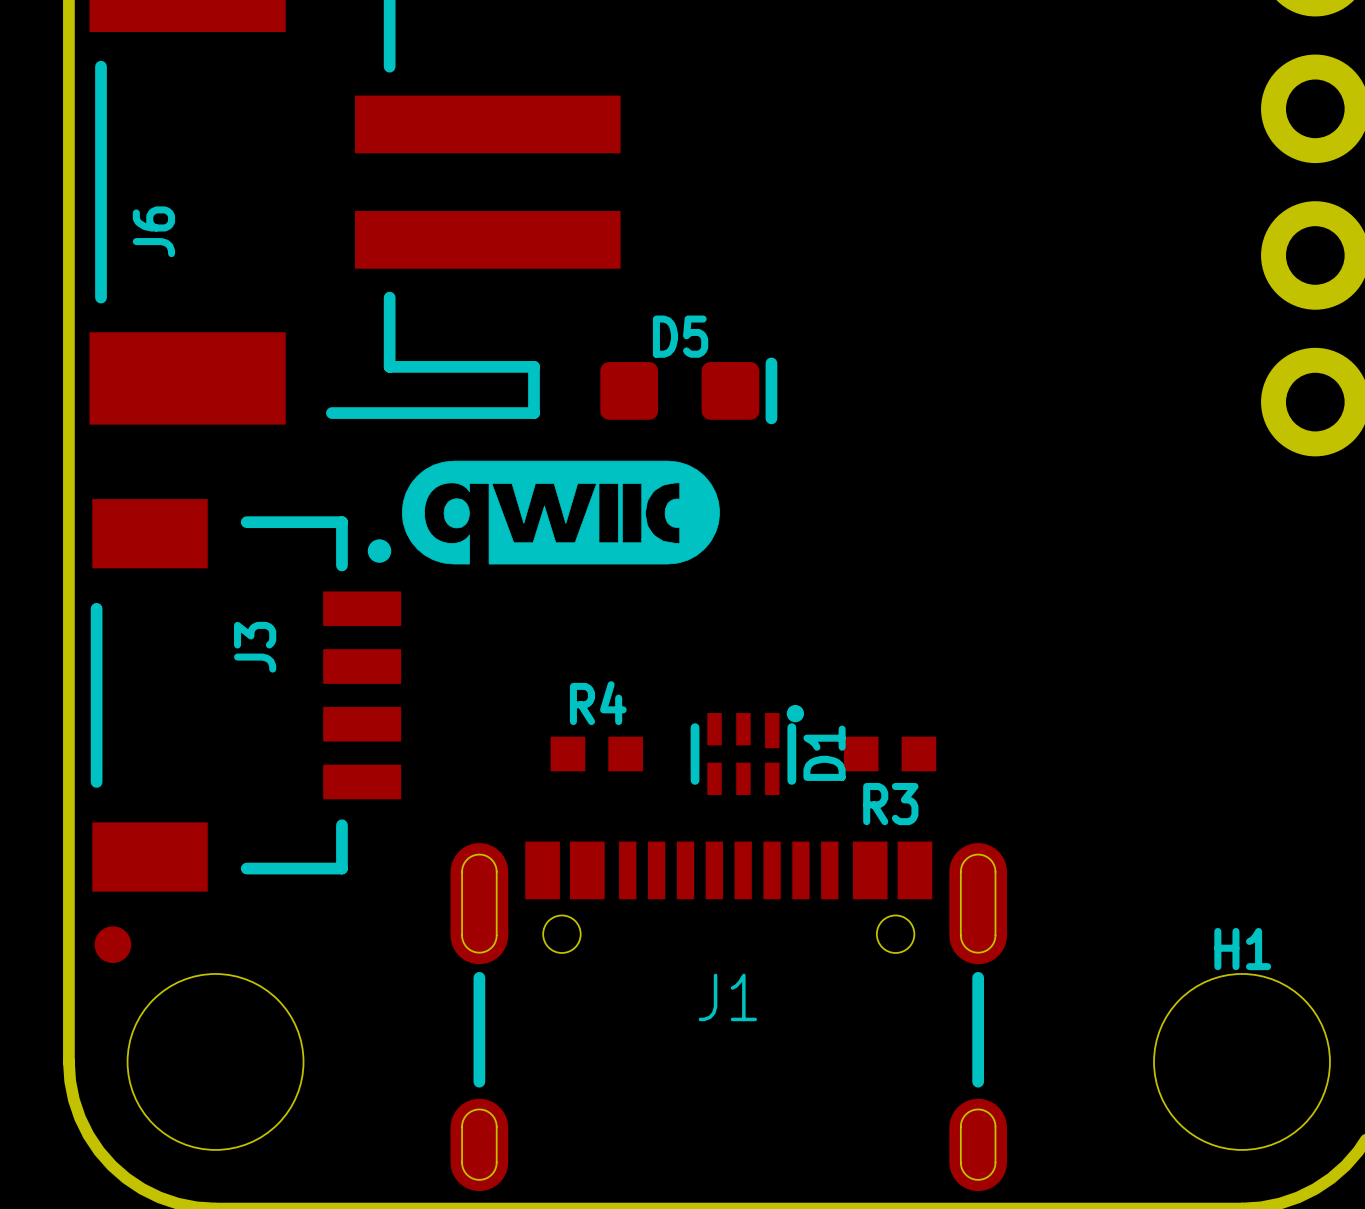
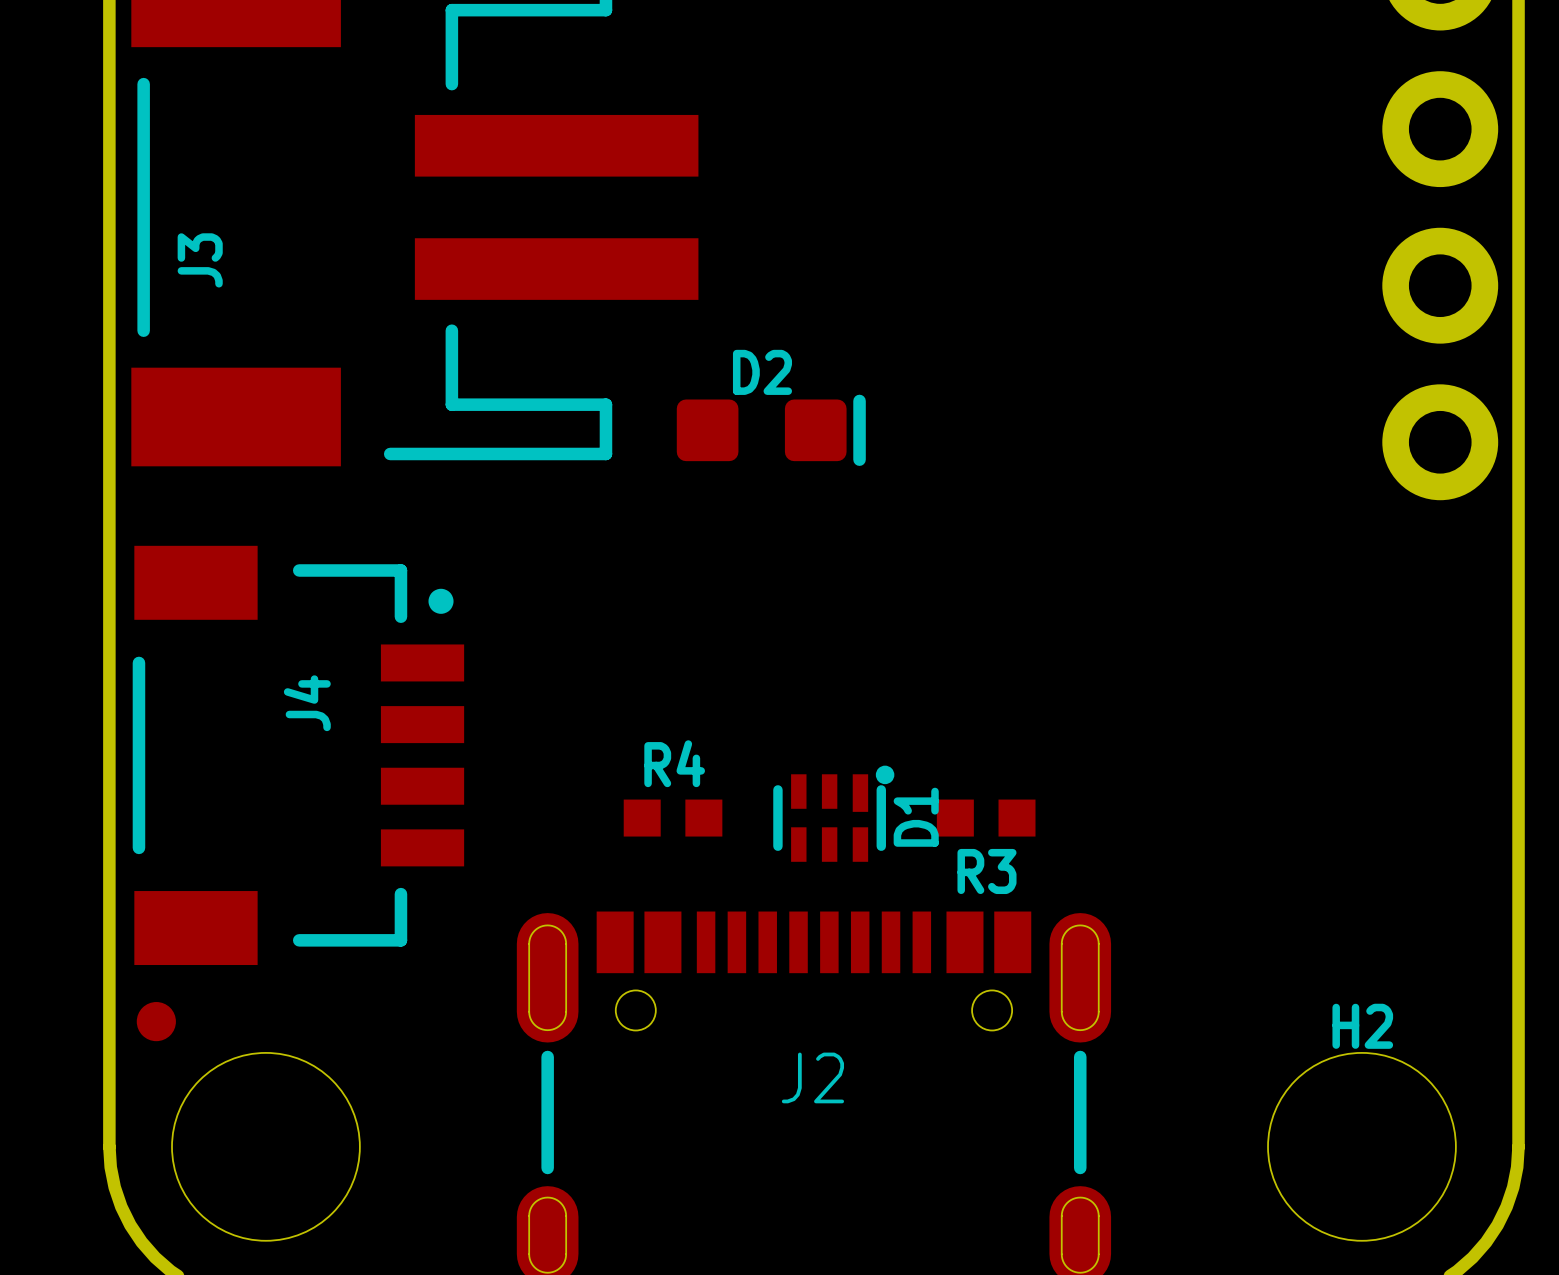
J6 name: J6 (153, 231) -> J3 (200, 260)
D5 name: D5 (680, 336) -> D2 (762, 372)
drawing: [401, 460, 720, 565] -> none
J3 name: J3 (255, 647) -> J4 (307, 703)
H1 name: H1 (1242, 949) -> H2 (1362, 1026)
J1 name: J1 (727, 997) -> J2 (812, 1077)

